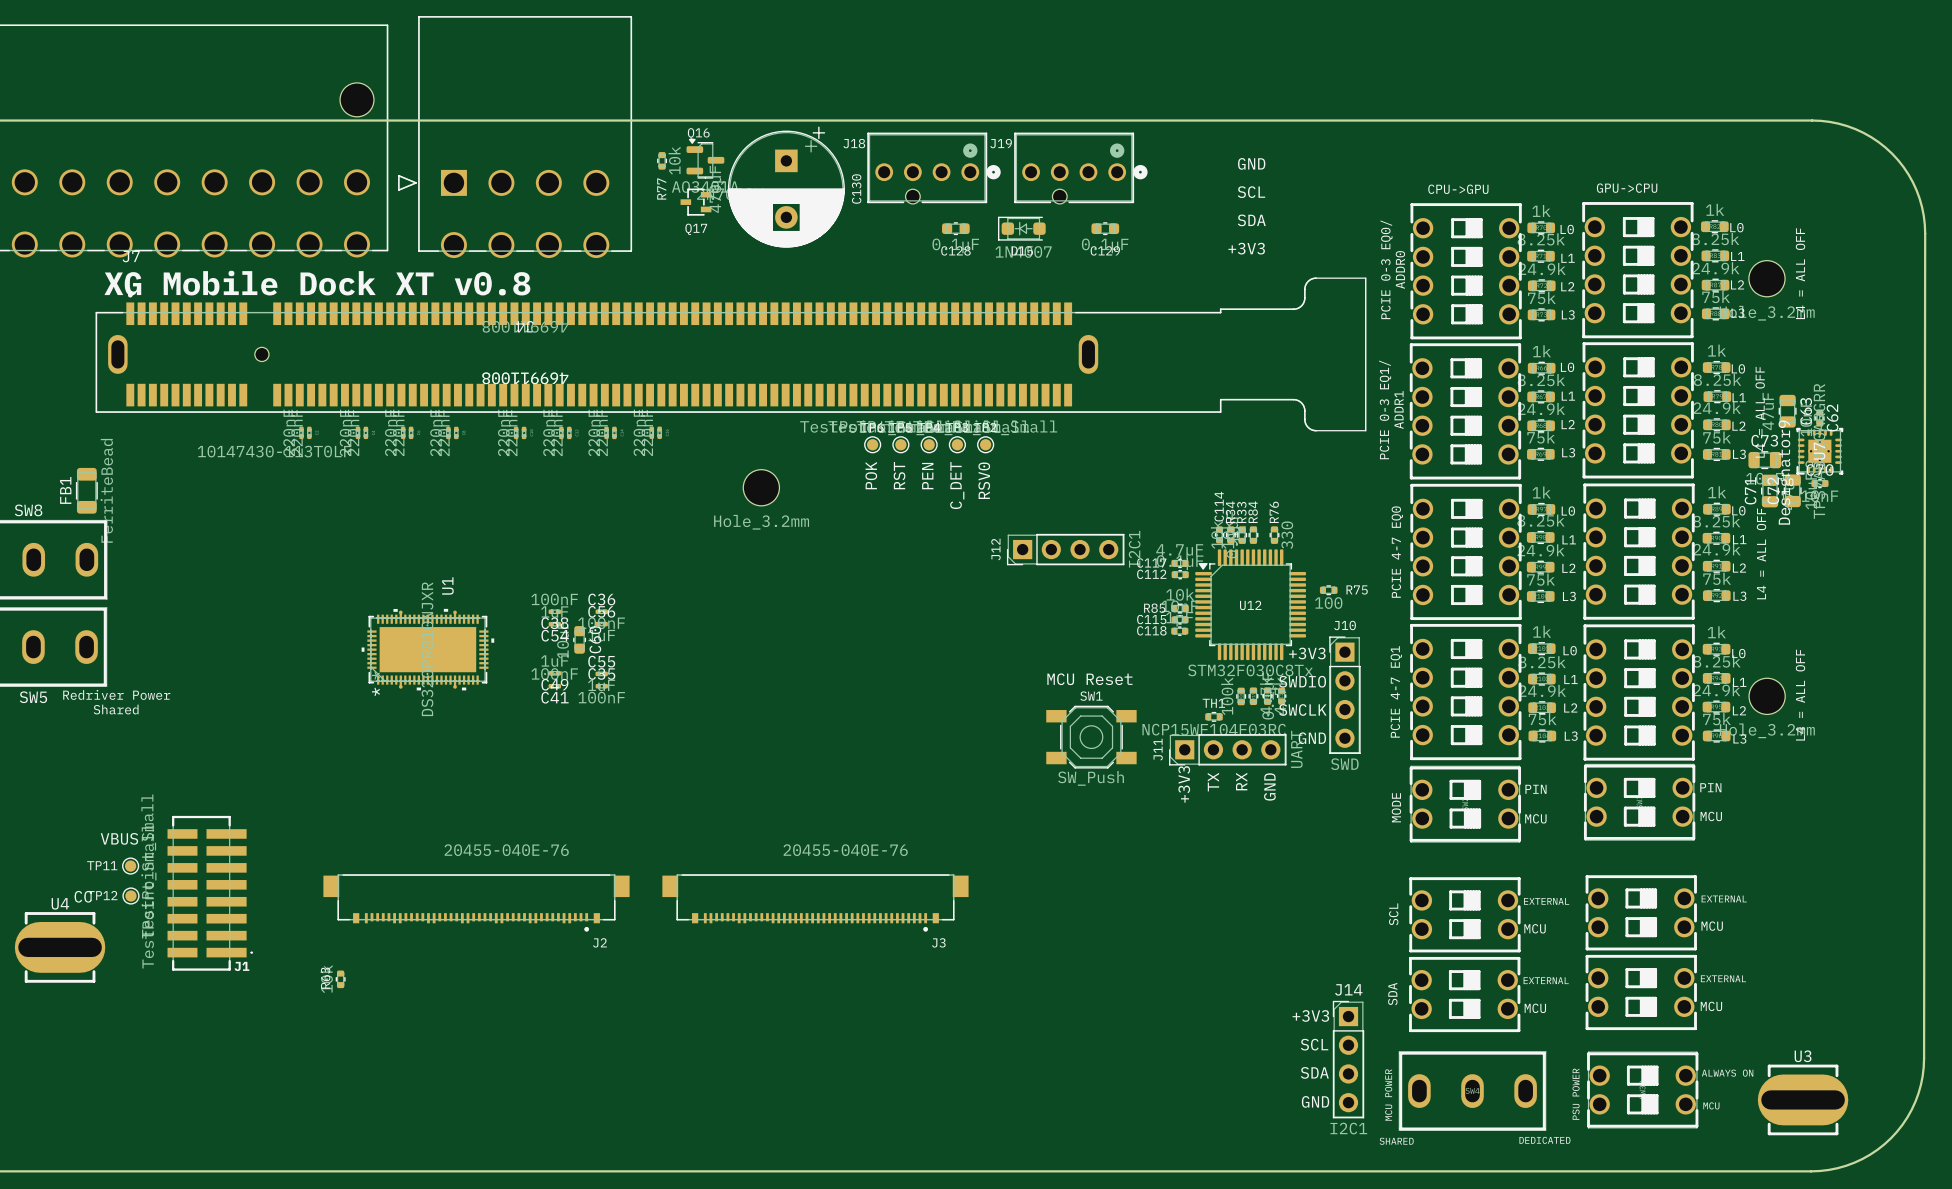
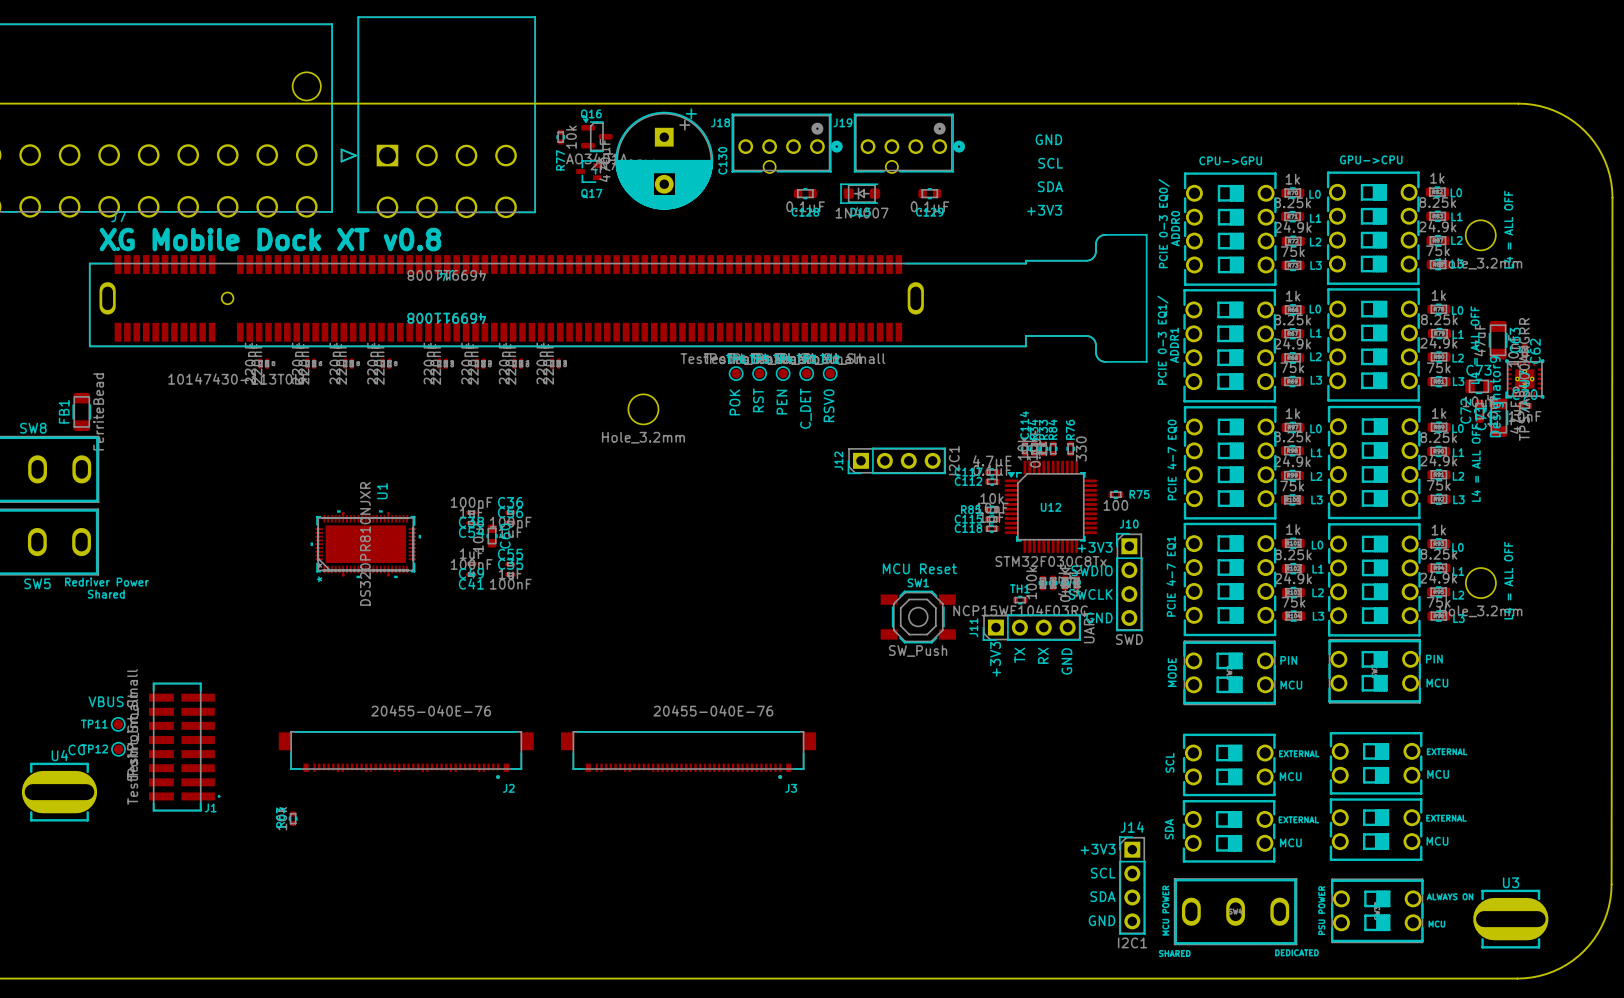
C63 footprint: [1778, 394, 1797, 428] -> [1488, 320, 1508, 360]
C71 footprint: [1761, 474, 1779, 508] -> [1489, 398, 1509, 437]
C72 footprint: [1783, 474, 1802, 508] -> [1474, 399, 1485, 423]

